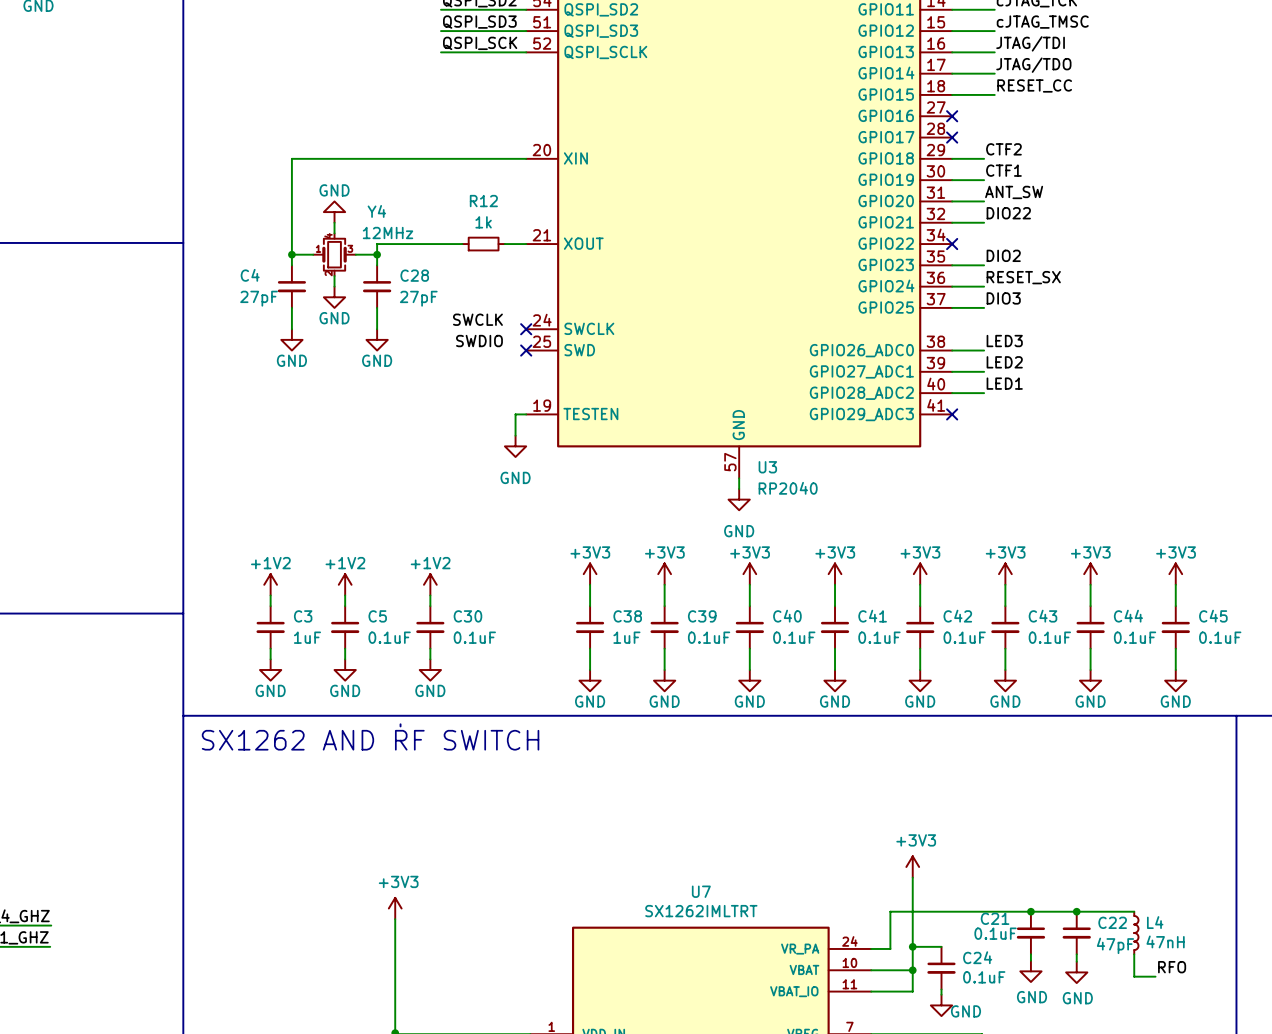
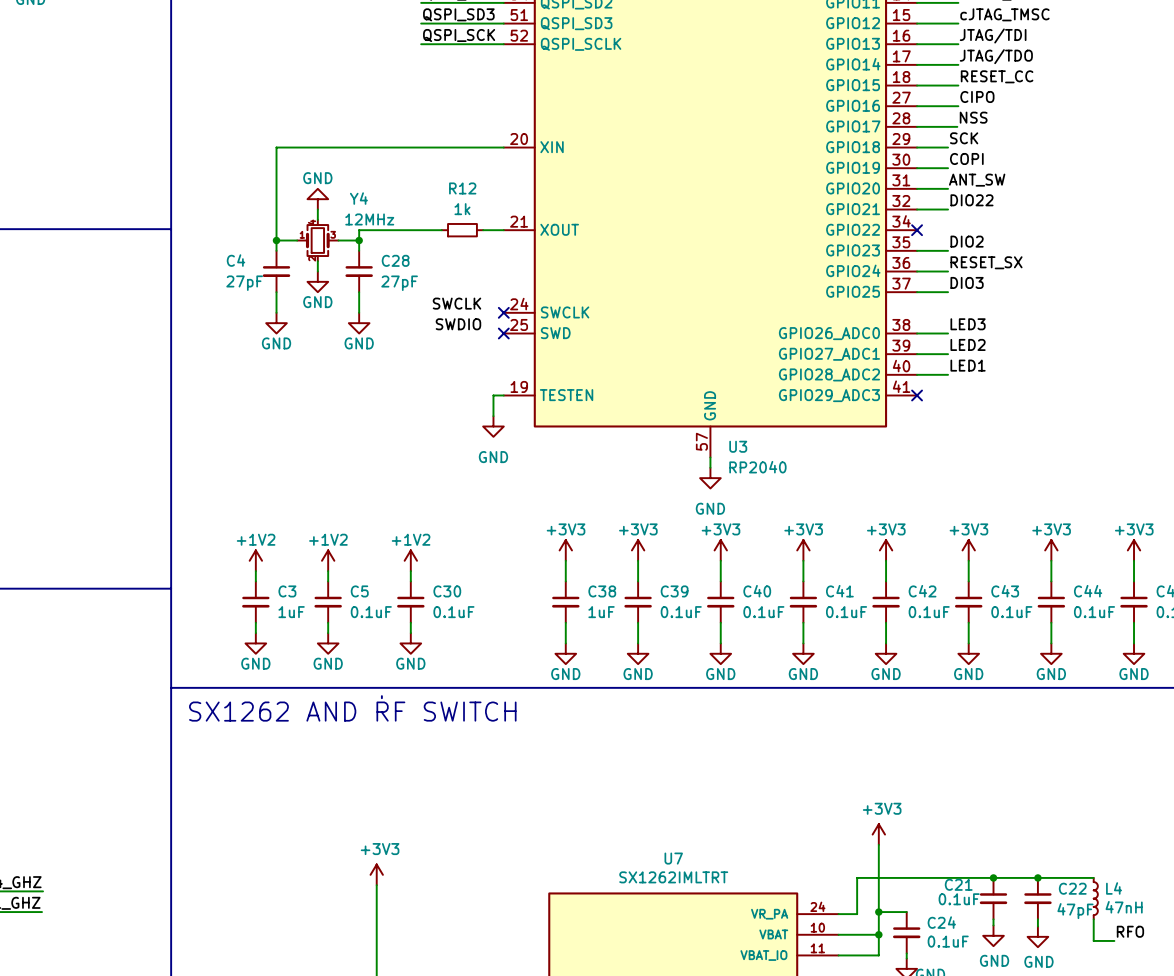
label: none -> CIPO (977, 96)
wire: none -> (917, 106) (958, 106)
no-connect mark: (952, 116) -> none
label: none -> NSS (973, 117)
wire: none -> (917, 126) (957, 126)
no-connect mark: (952, 137) -> none
label: CTF2 (1003, 149) -> SCK (964, 138)
label: CTF1 (1003, 170) -> COPI (966, 158)

